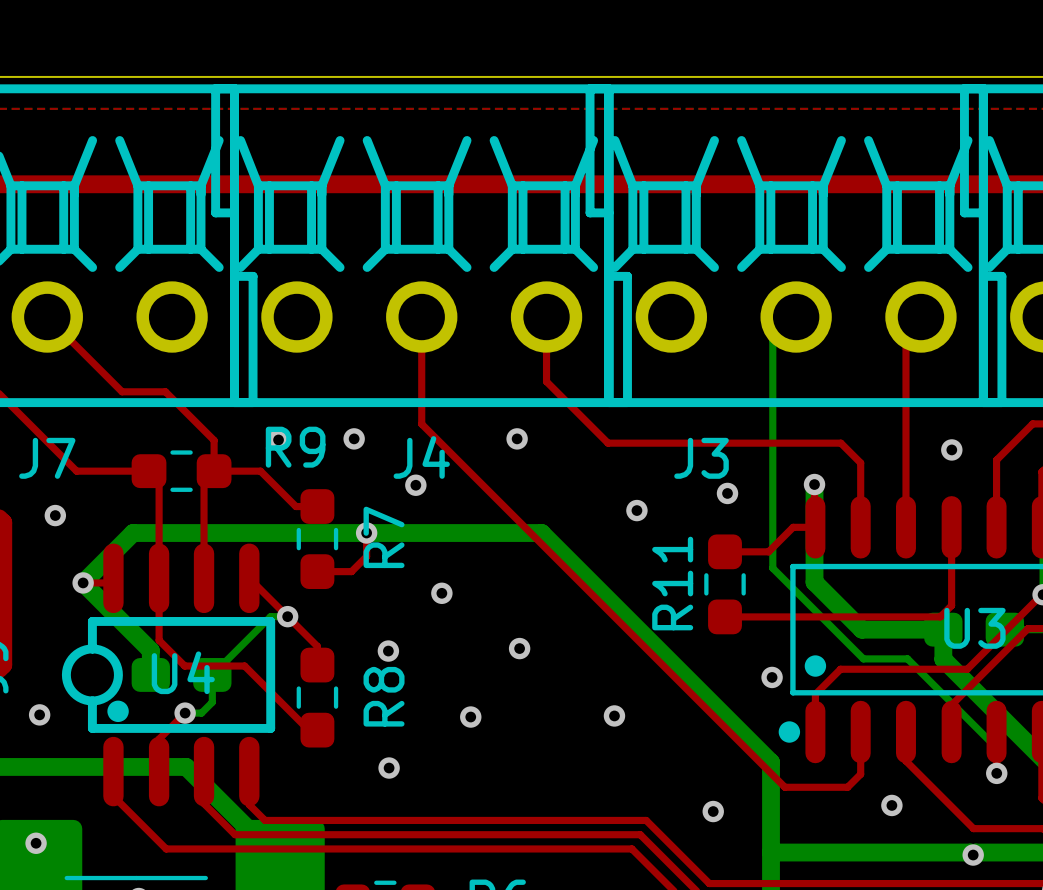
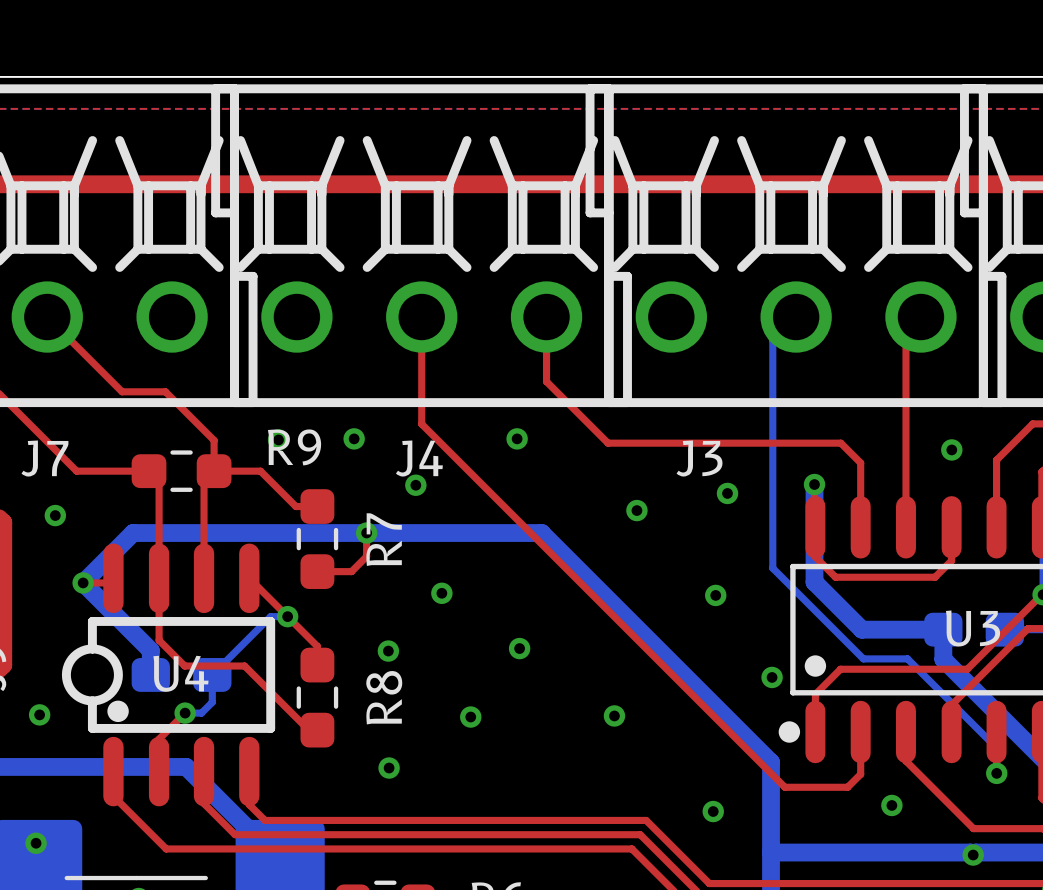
top track: (815, 527) (793, 527) (768, 551) (725, 551) -> none
top track: (951, 560) (951, 605) (940, 616) (725, 616) -> (951, 560) (935, 577) (835, 577) (815, 557) (815, 527)
R11: (725, 584) -> none
via: none -> (715, 595)

